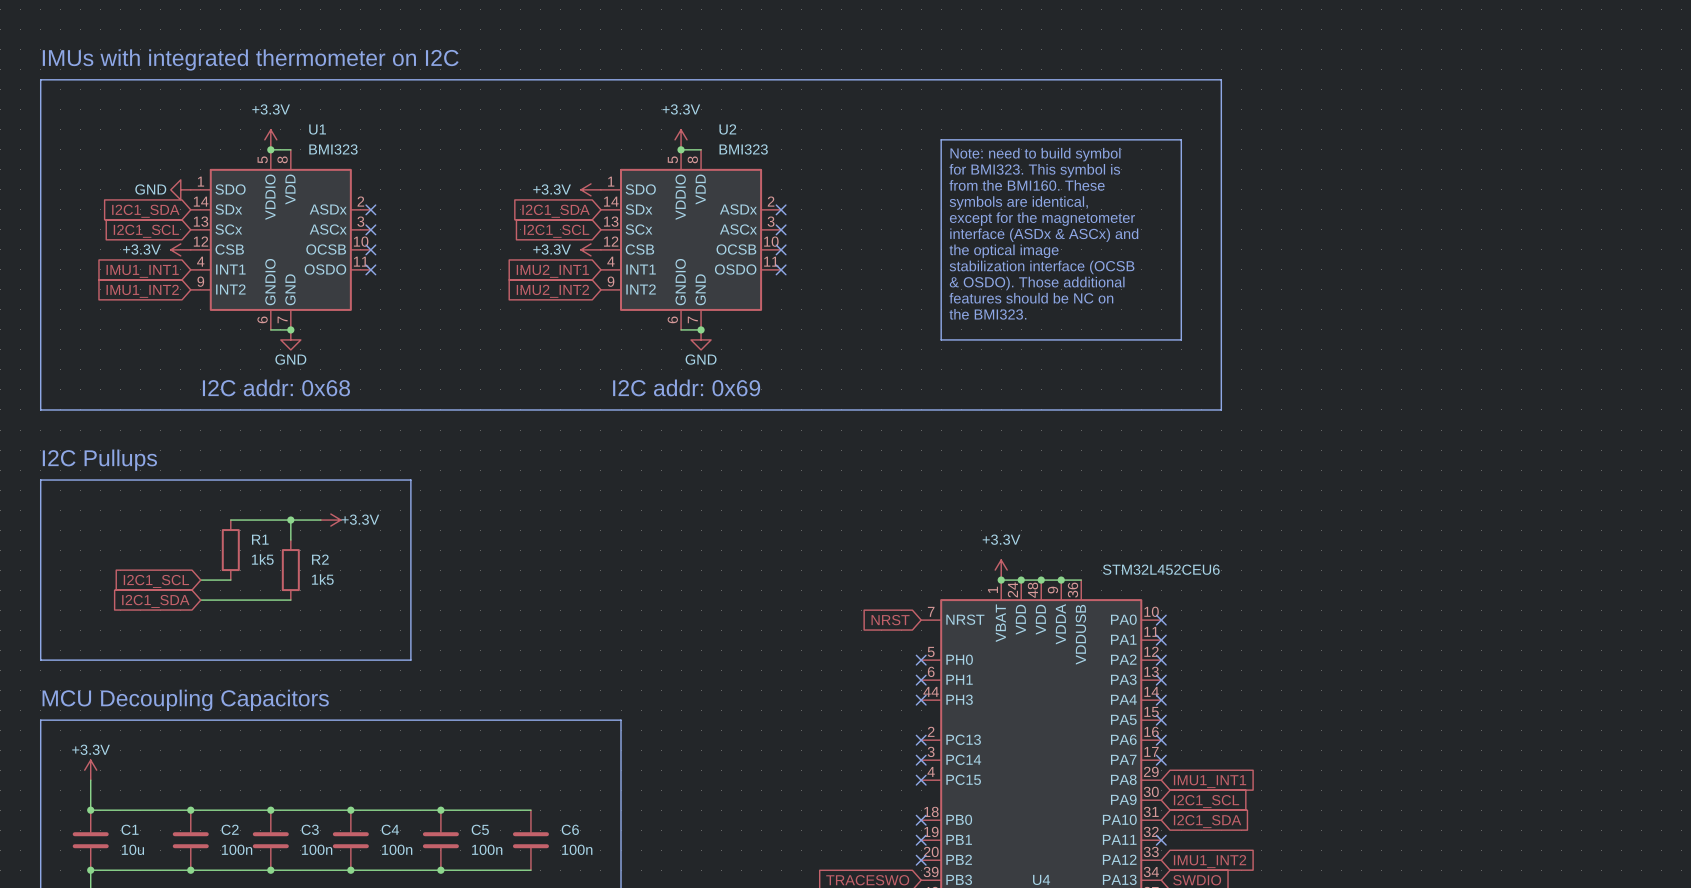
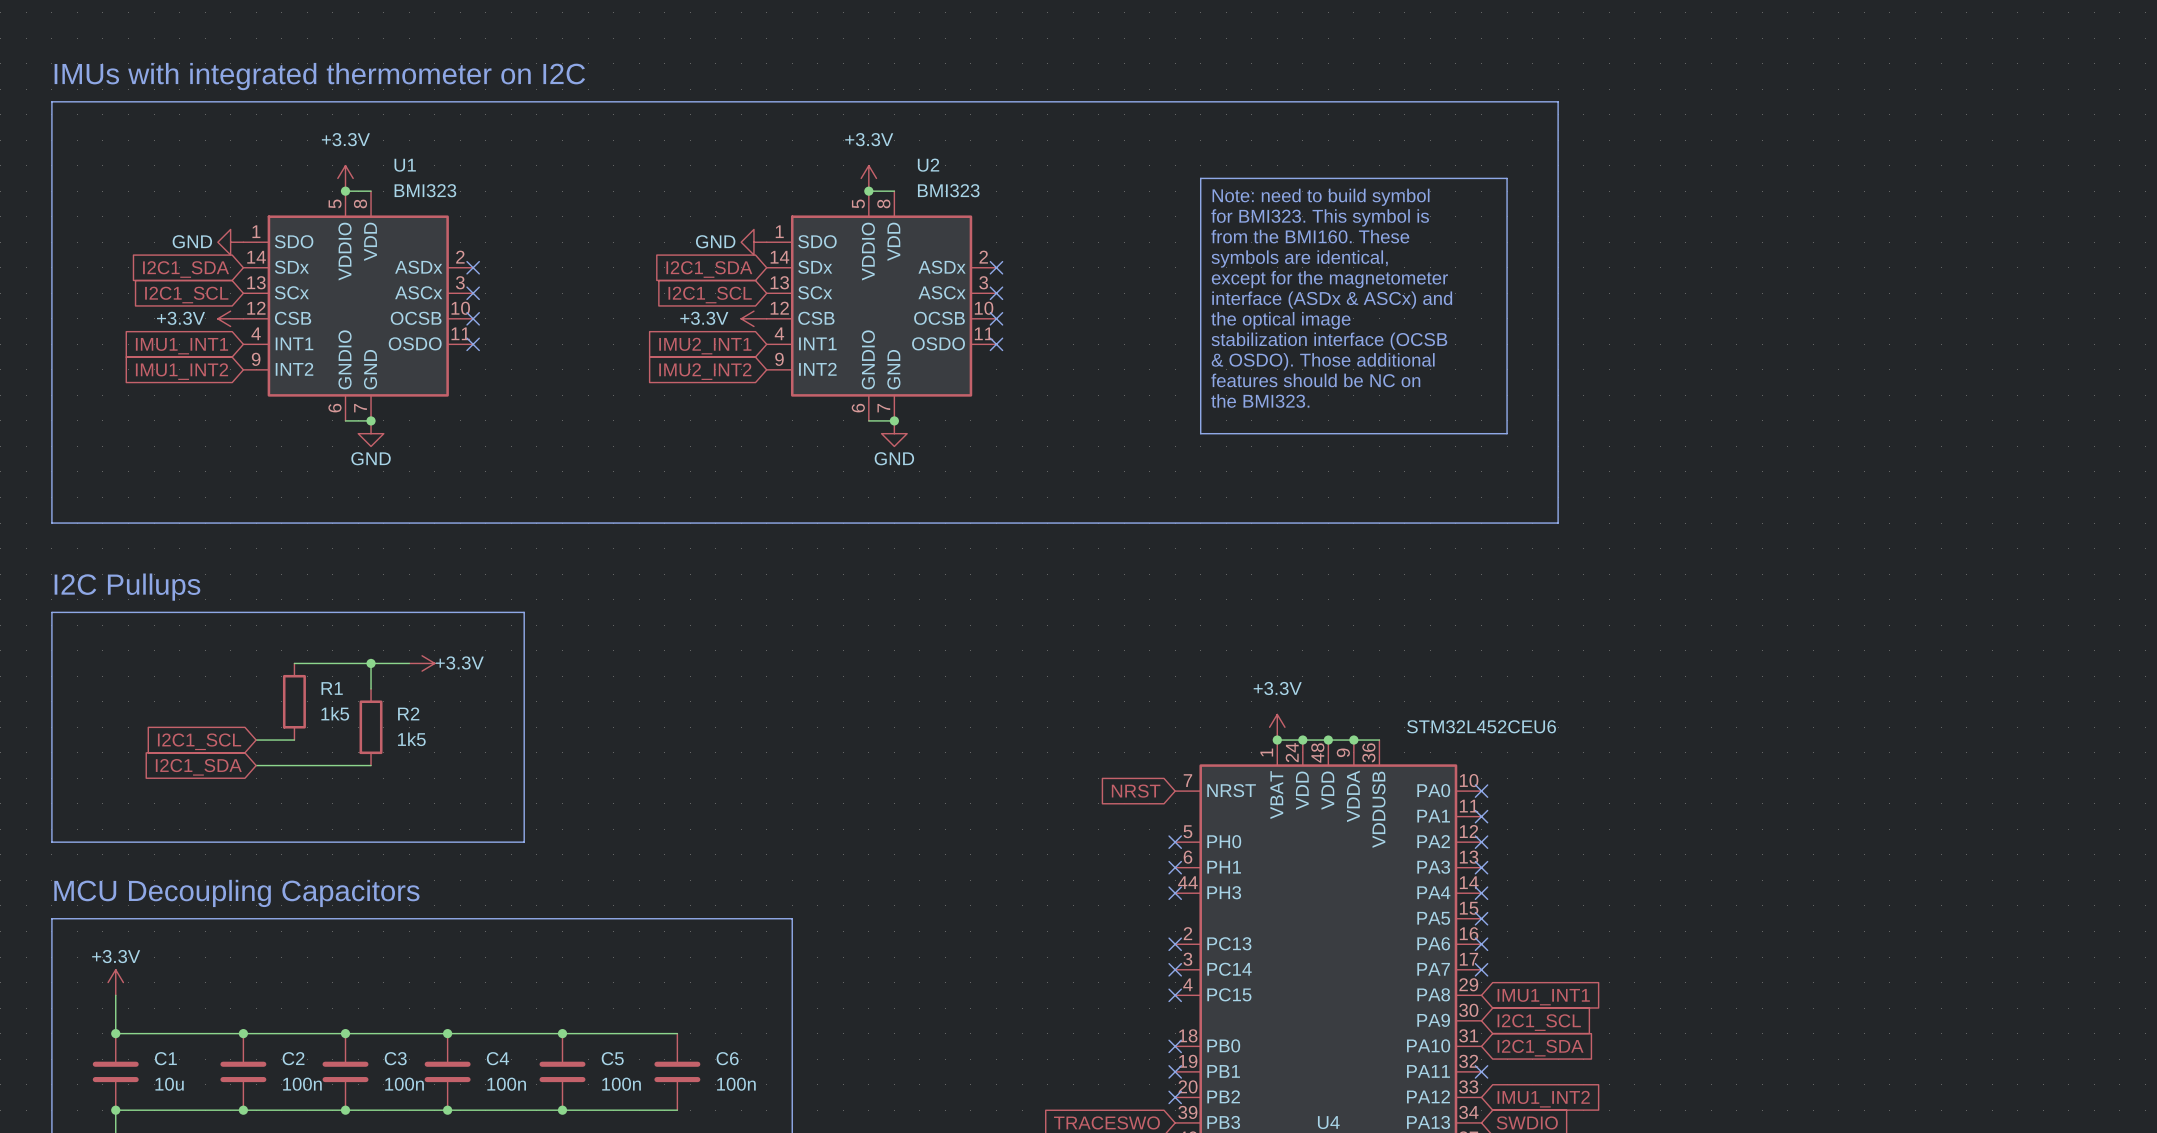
power symbol: +3.3V (590, 189) -> GND (753, 242)
text: I2C addr: 0x68 (276, 387) -> none
text: I2C addr: 0x69 (686, 387) -> none

